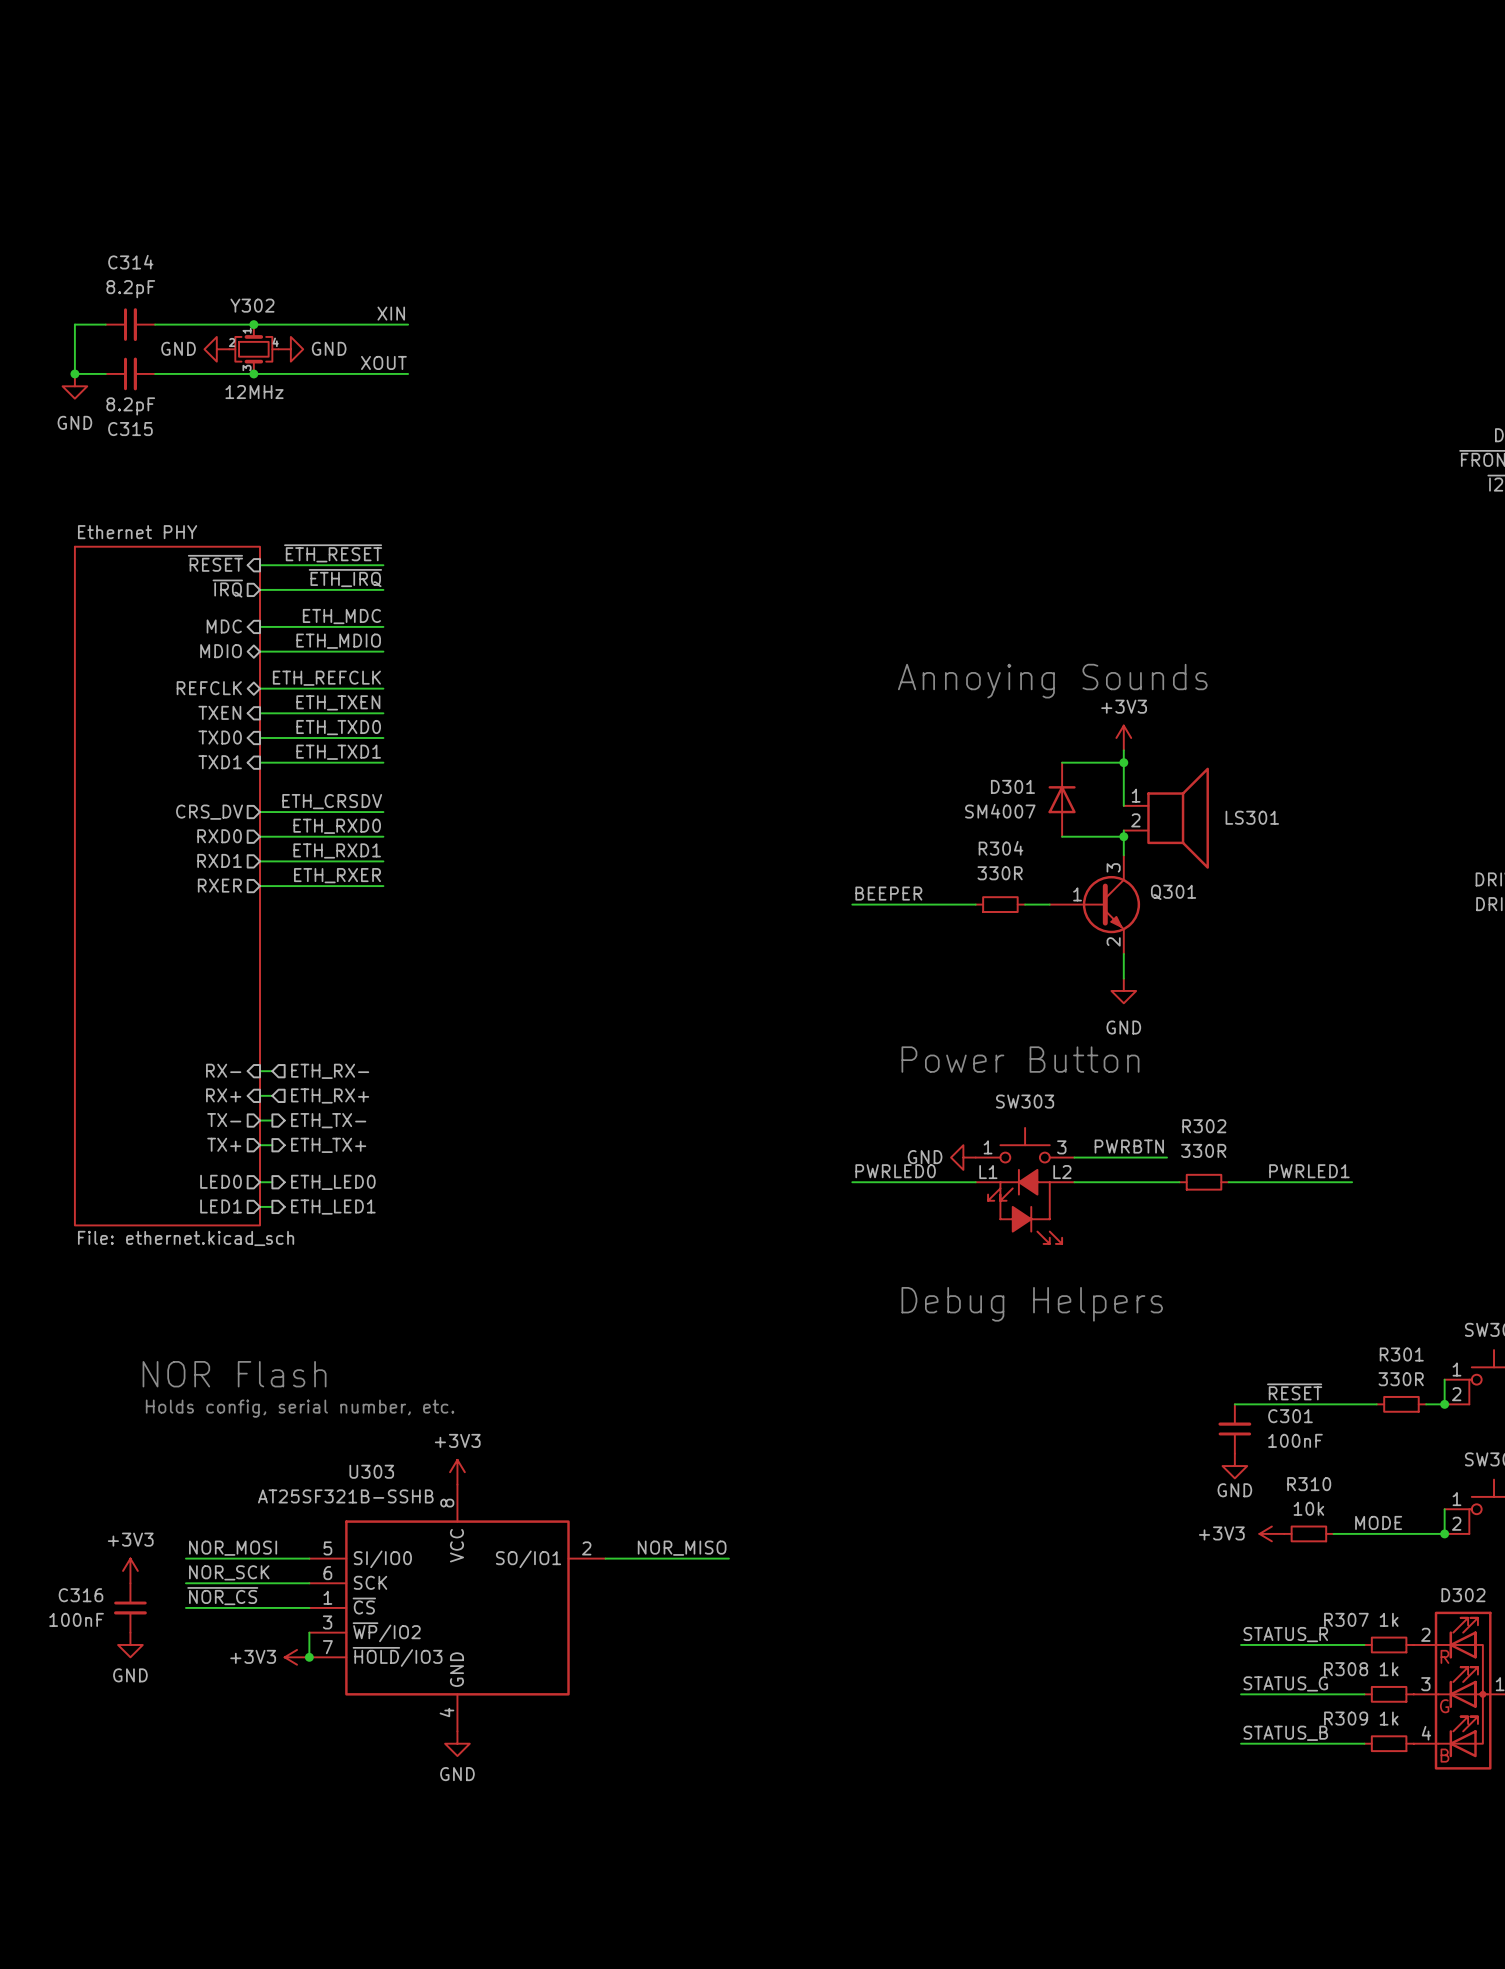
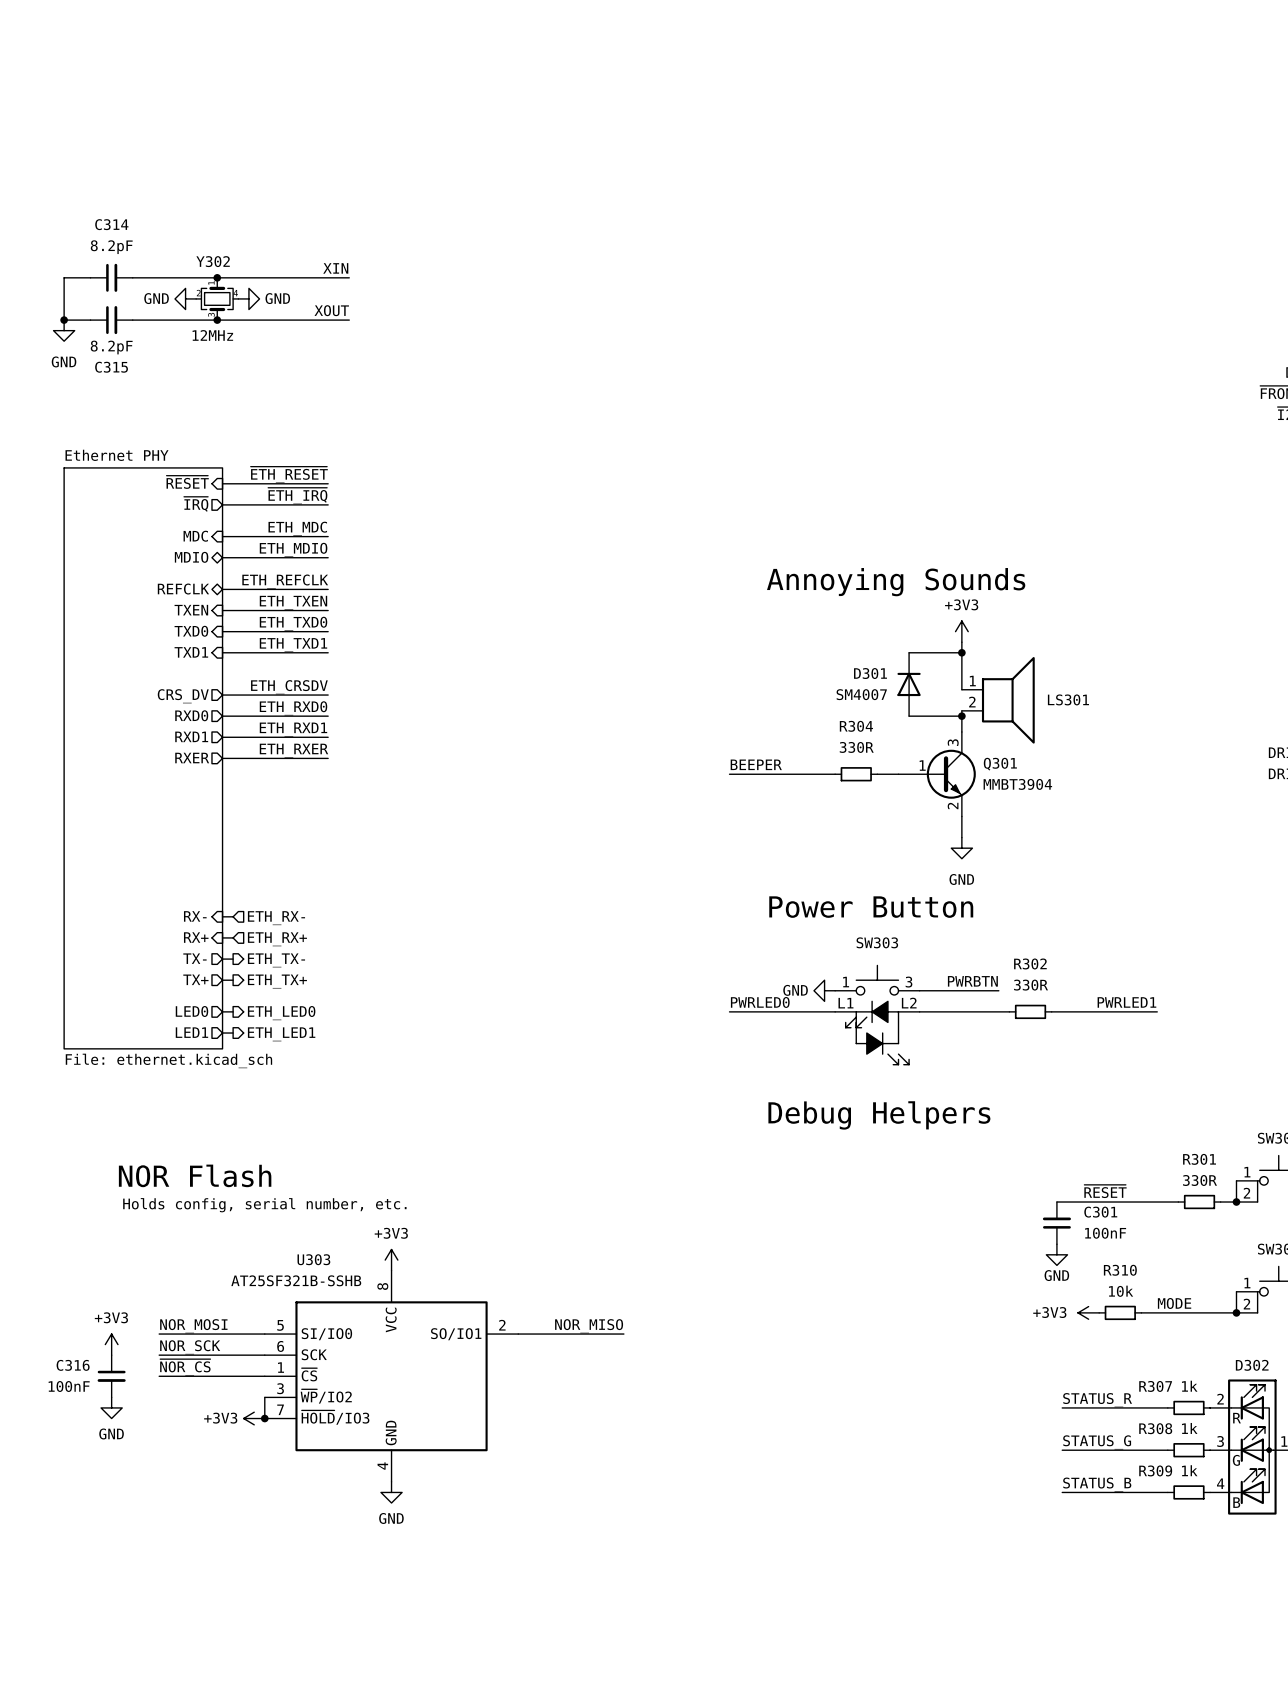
Q301 value: none -> MMBT3904 (1017, 784)

